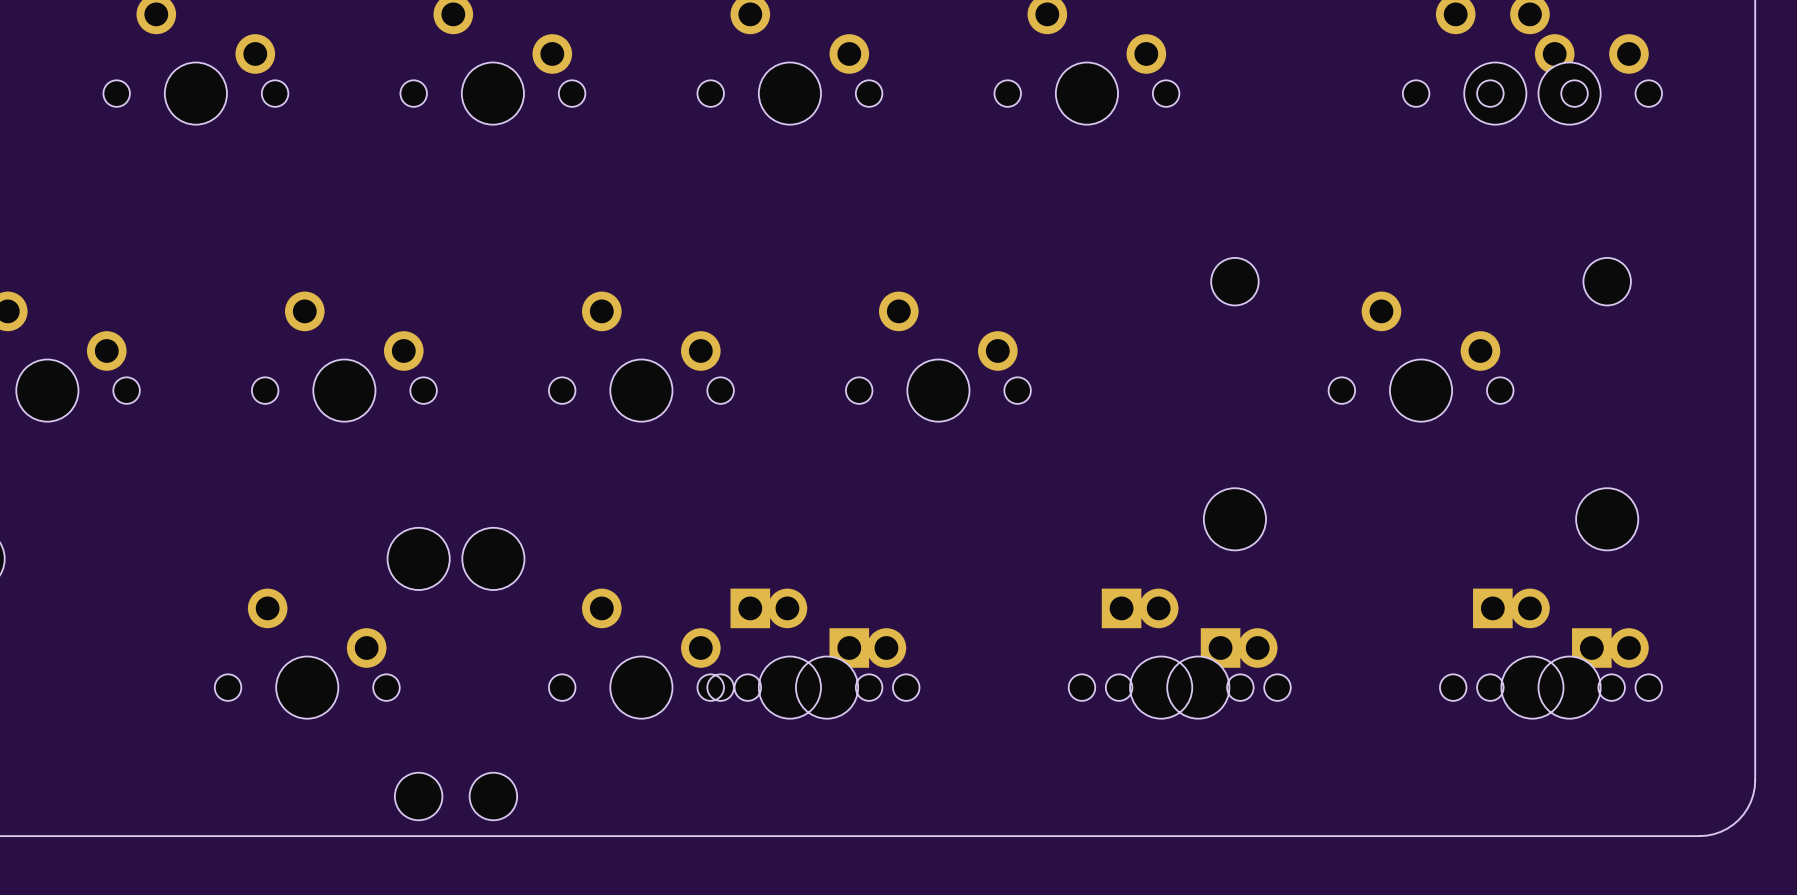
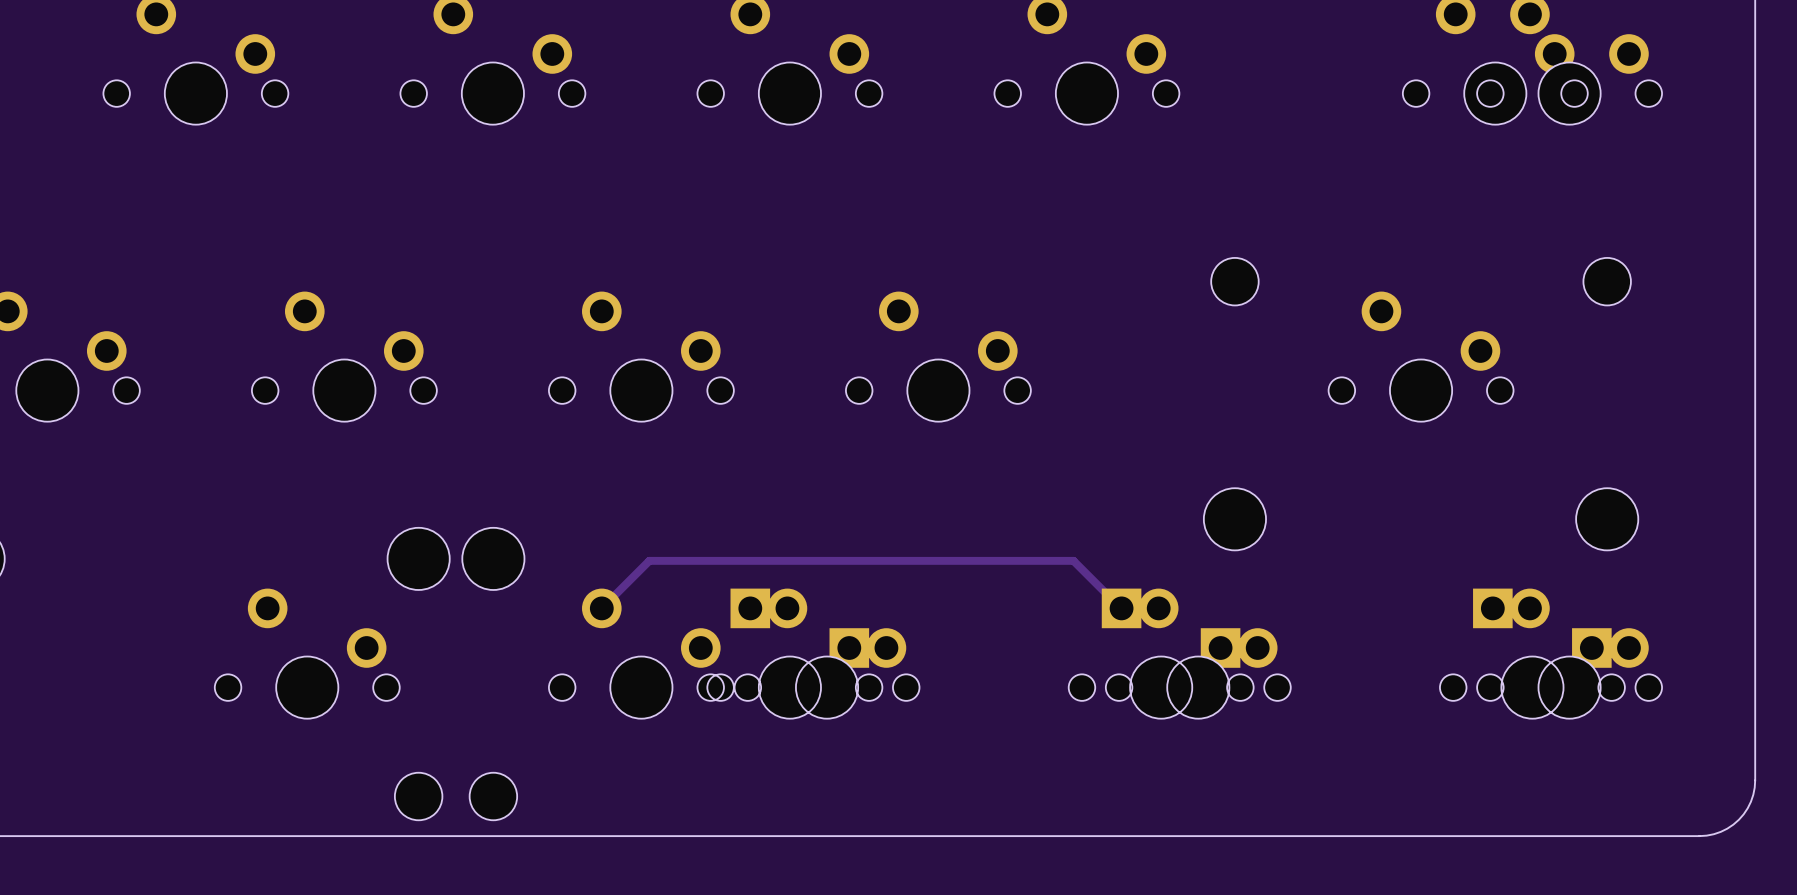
track: none -> (601, 608) (649, 560) (1073, 560) (1125, 610)

